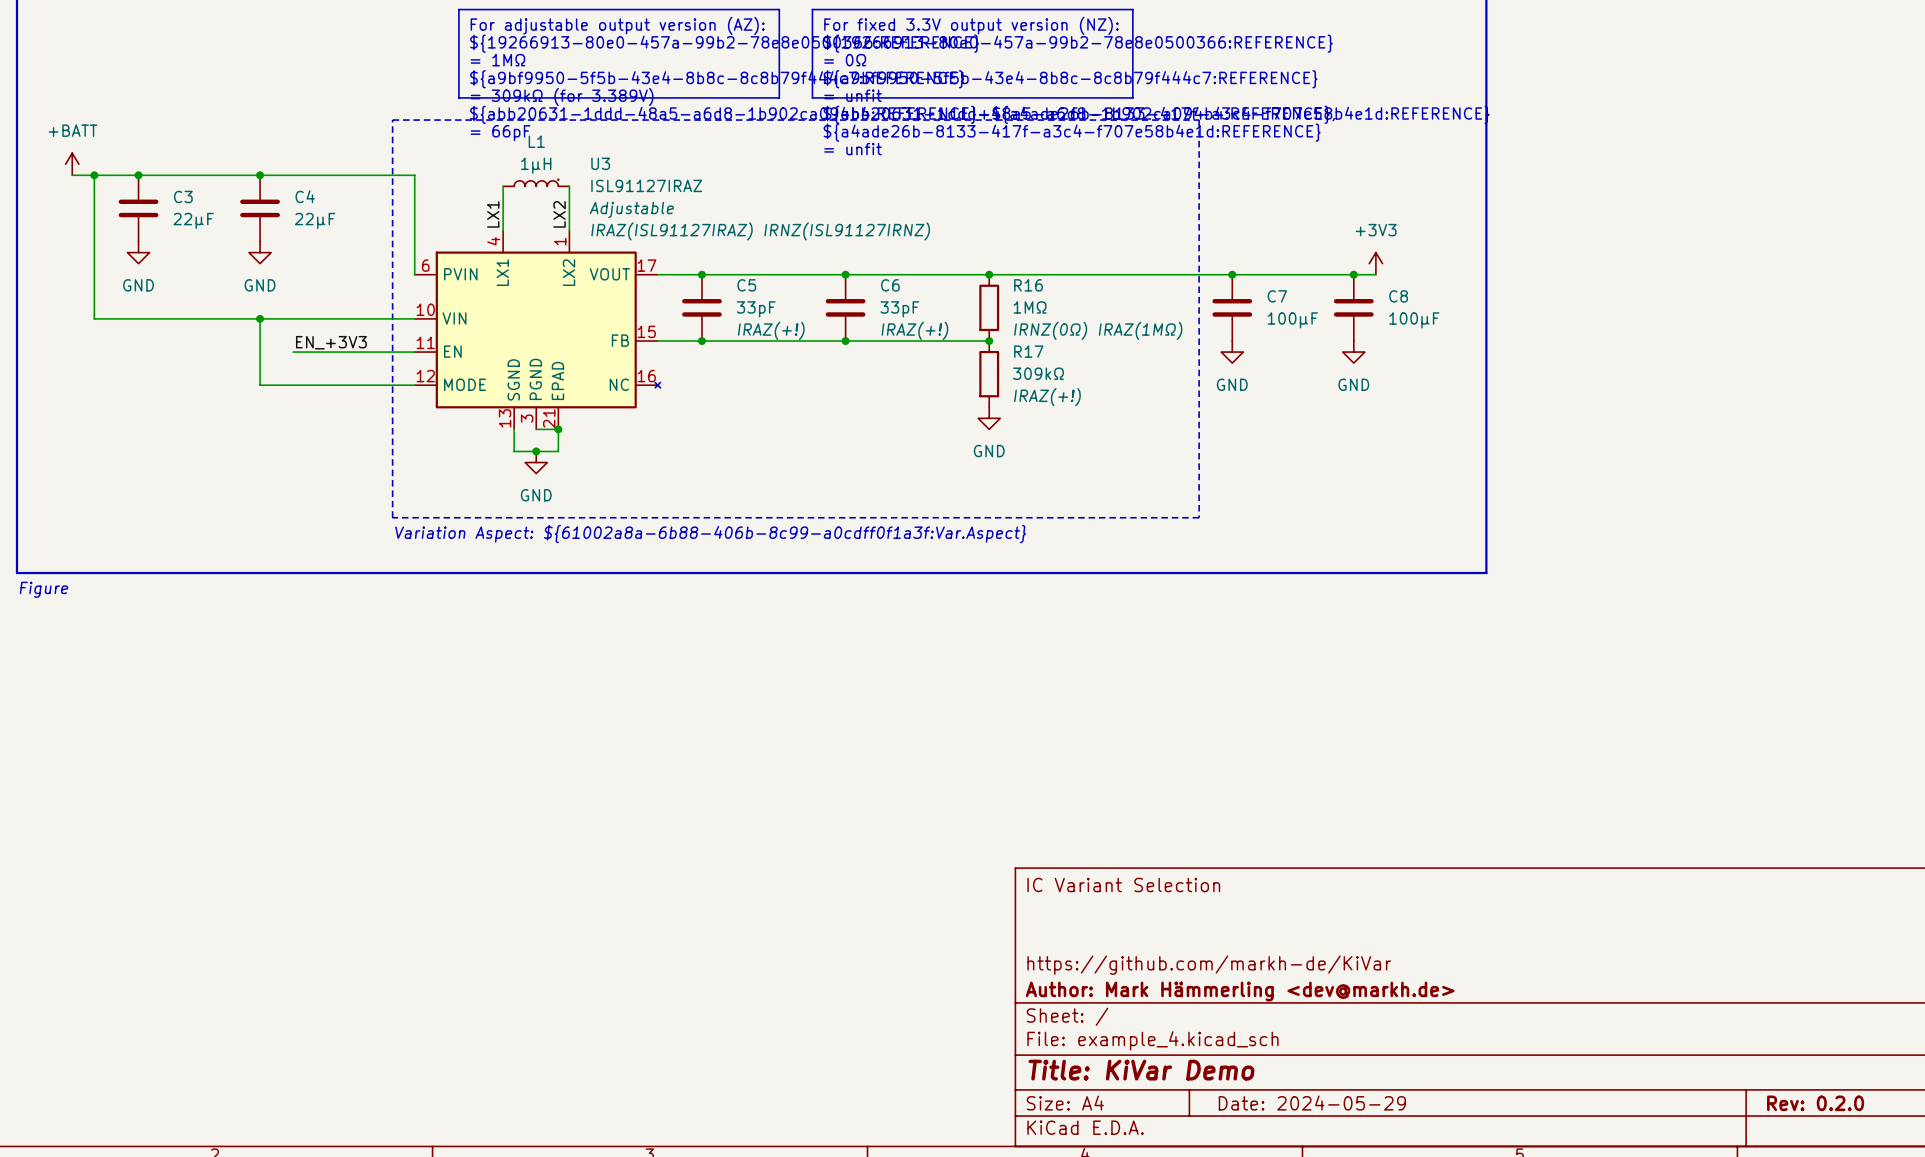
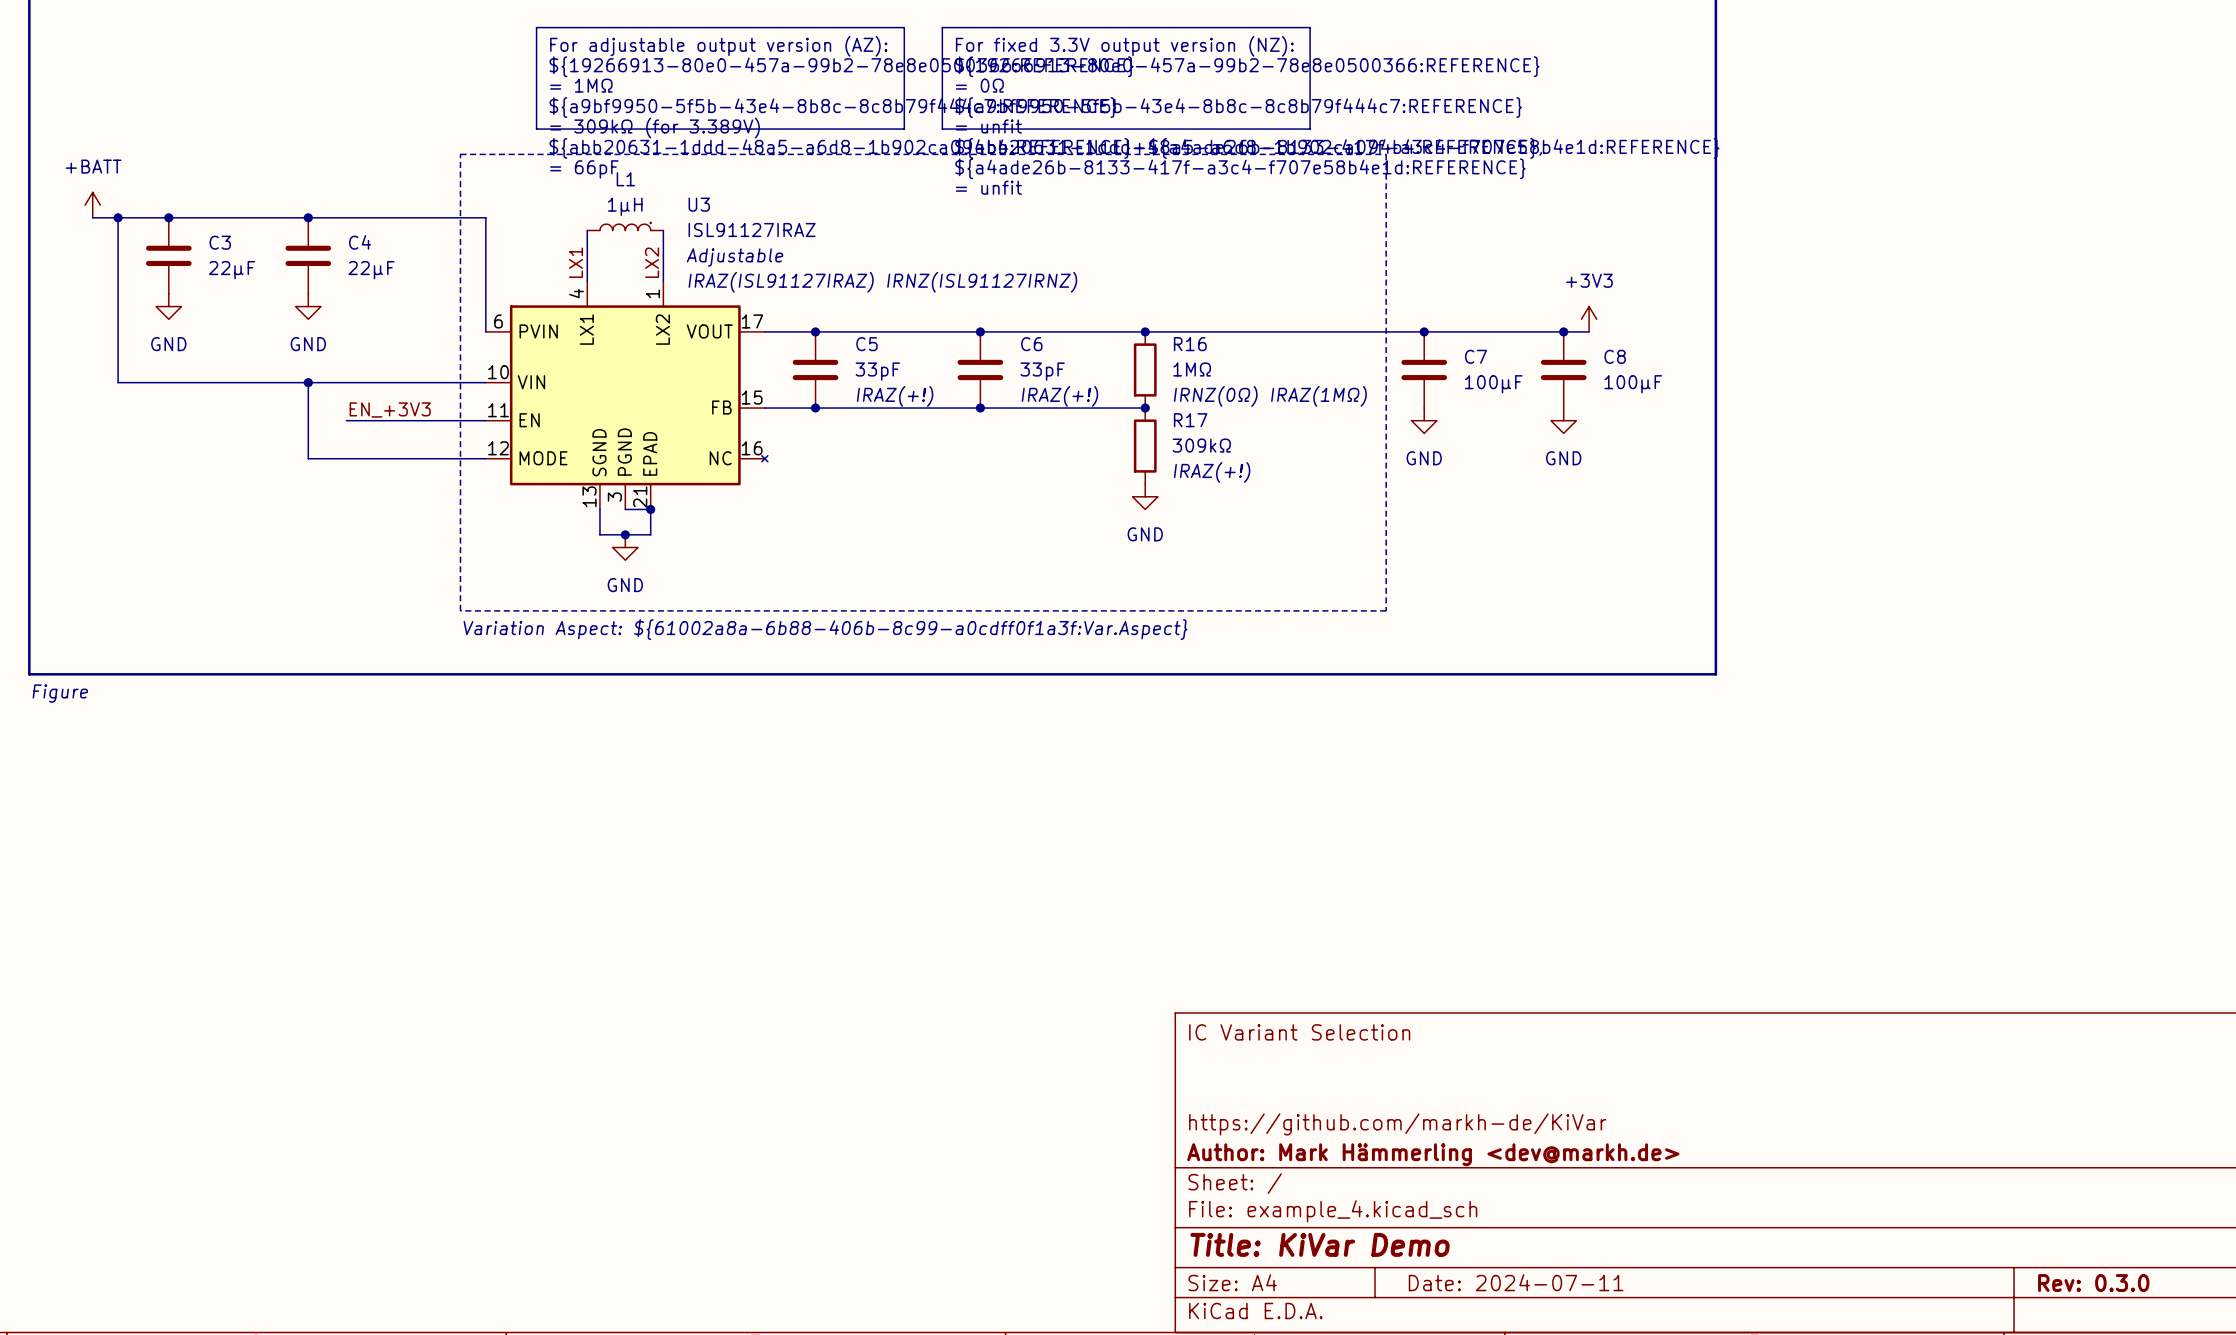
title block: Date: 2024-05-29 (1312, 1103) -> Date: 2024-07-11 (1516, 1282)
title block: Rev: 0.2.0 (1815, 1103) -> Rev: 0.3.0 (2093, 1283)

